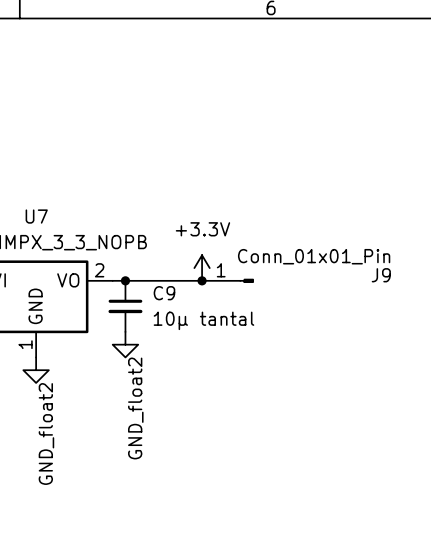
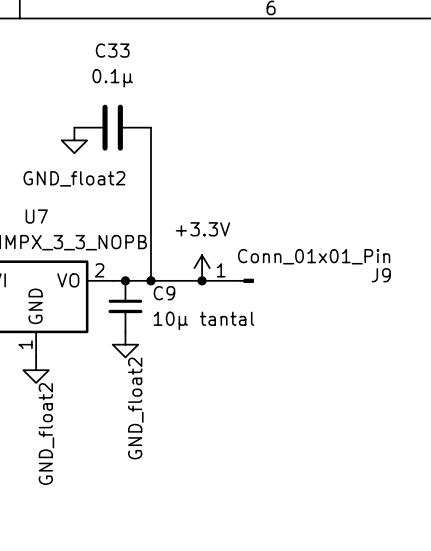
C33: none -> 0.1µ (112, 127)
wire: none -> (150, 127) (150, 280)
power symbol: none -> GND_float2 (74, 140)
junction: none -> (150, 280)

